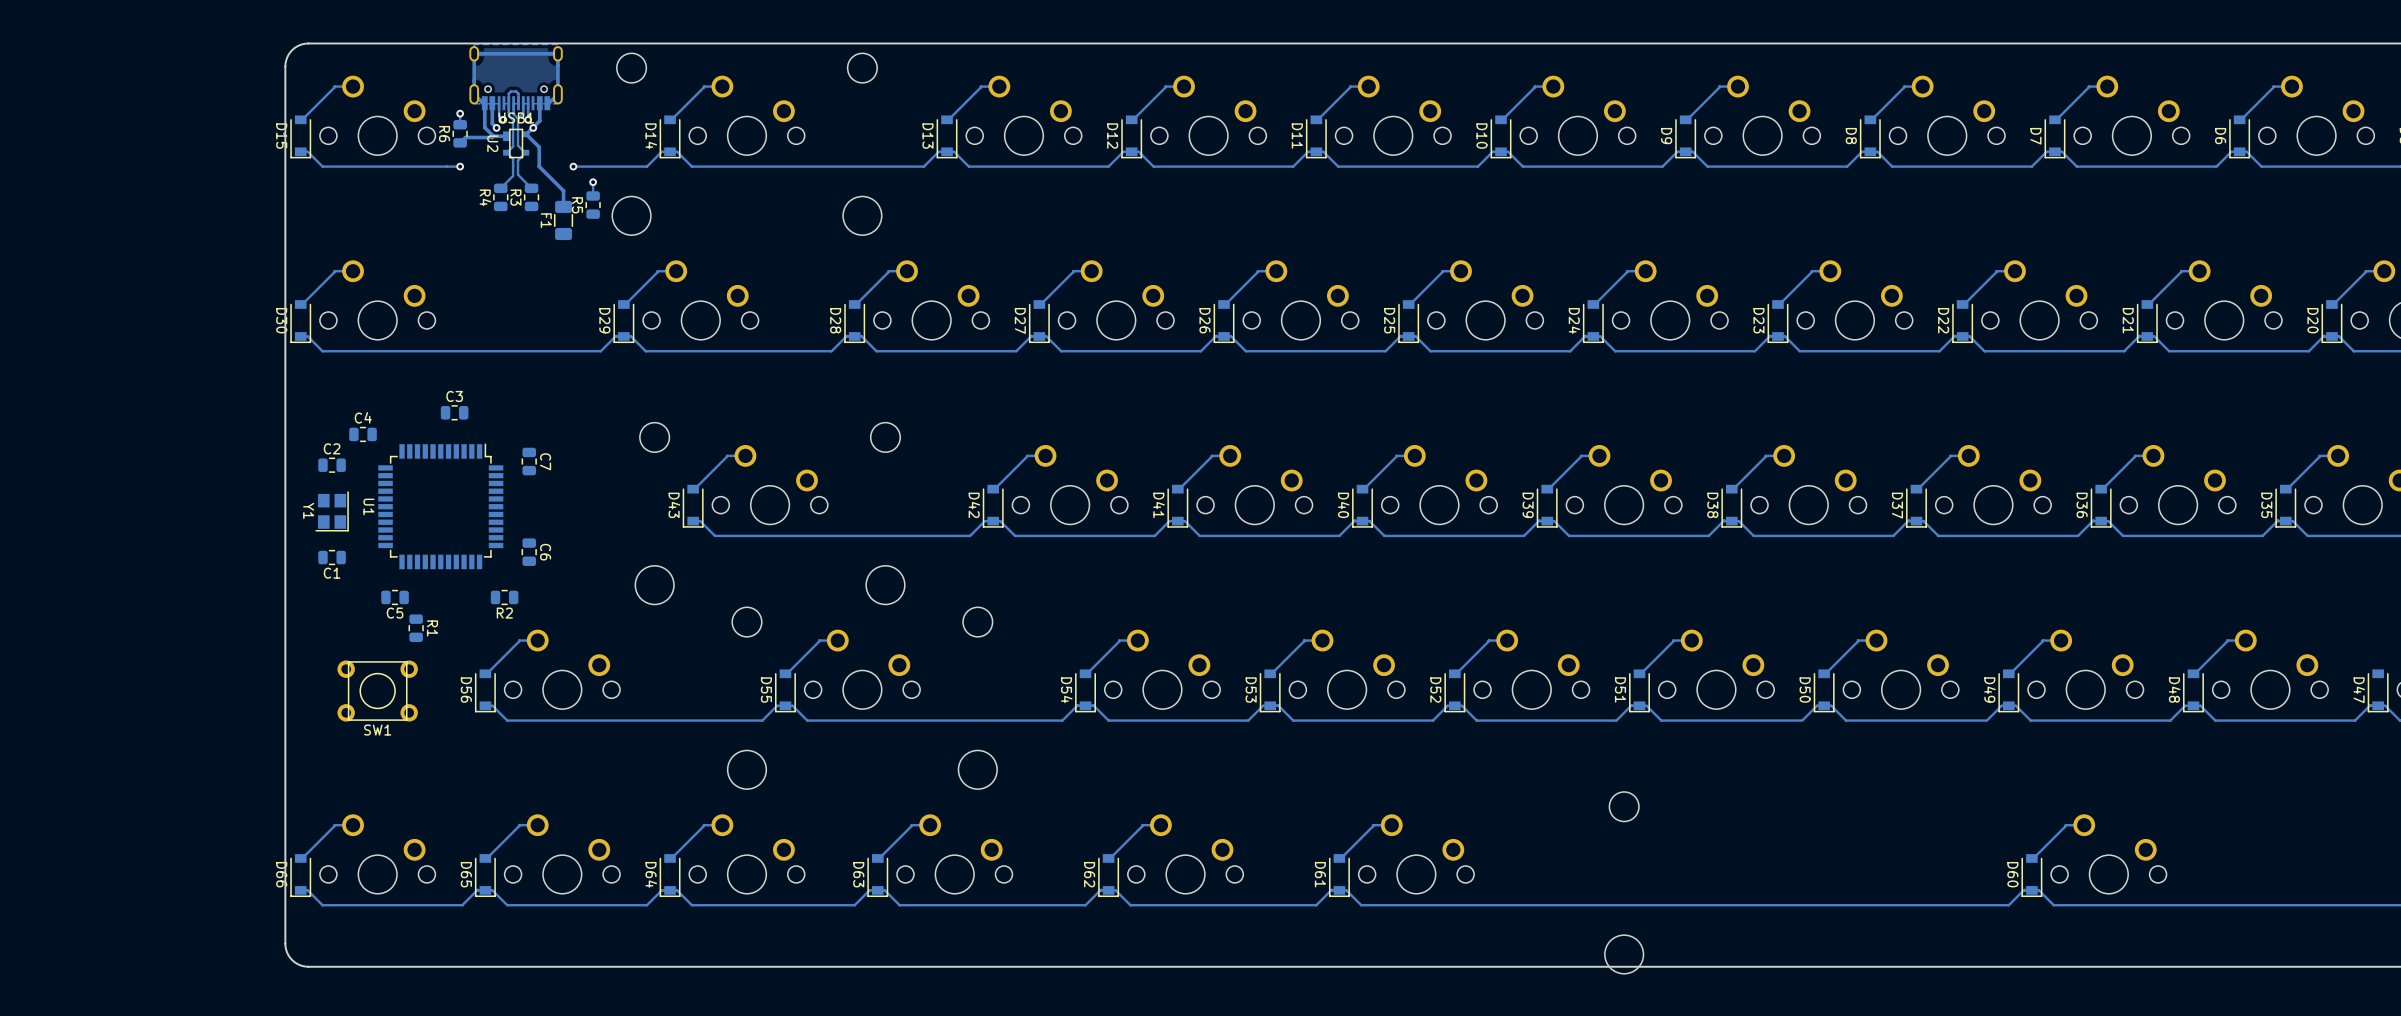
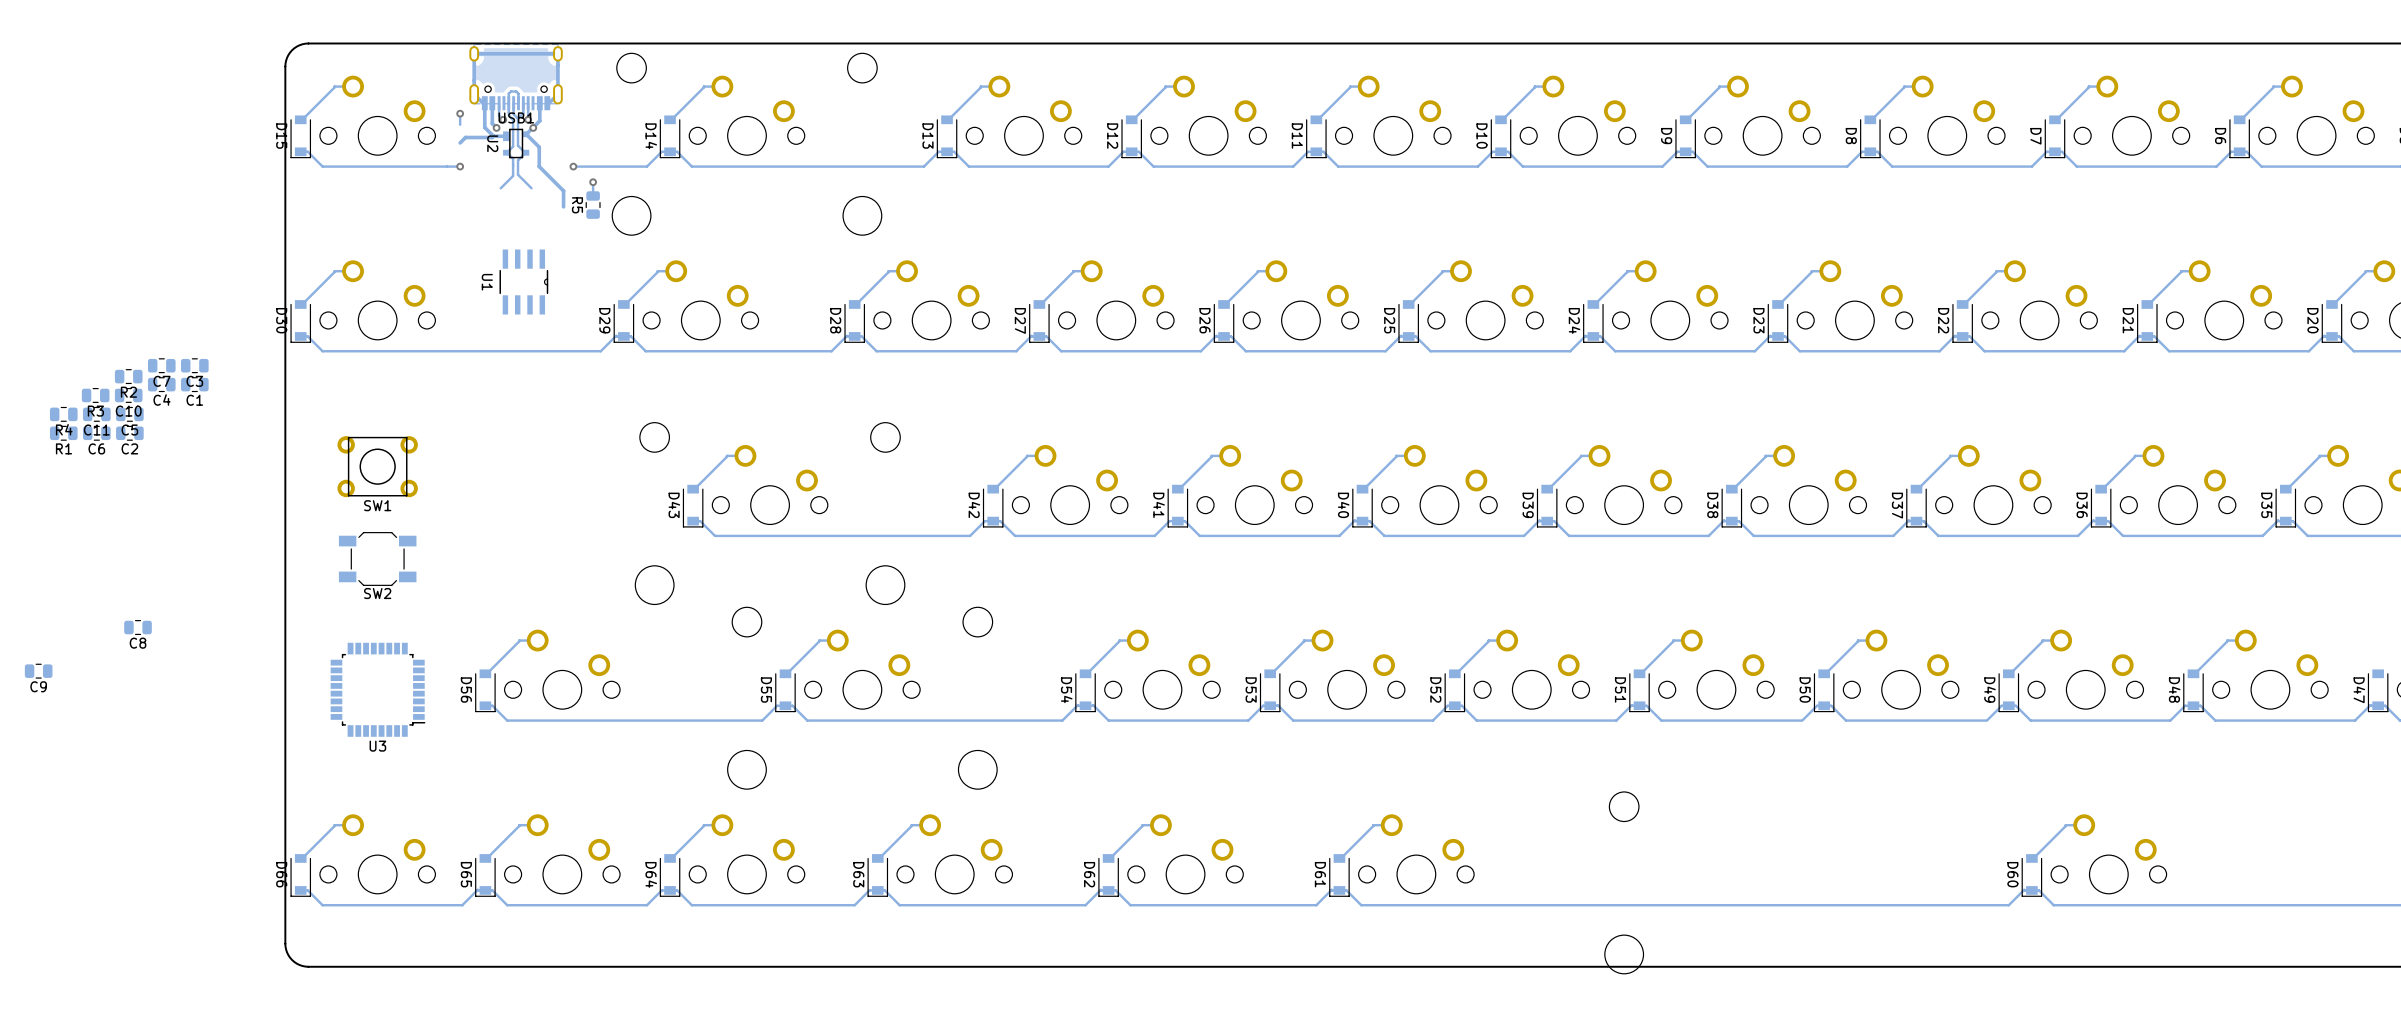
R6: (460, 133) -> none
R4 name position: R4 (485, 197) -> R4 (64, 429)
R4 rotation: 0° (500, 197) -> 90° clockwise (63, 414)
R4 position: (500, 197) -> (63, 414)
R3 name position: R3 (515, 197) -> R3 (95, 411)
R3 rotation: 0° (531, 197) -> 90° clockwise (95, 395)
R3 position: (531, 197) -> (95, 395)
F1: (563, 220) -> none
C10: none -> (128, 395)
C3 name position: C3 (454, 396) -> C3 (194, 381)
C3 position: (454, 412) -> (194, 365)
C11: none -> (96, 414)
C4 name position: C4 (363, 417) -> C4 (161, 400)
C4 position: (363, 434) -> (161, 384)
U1 footprint: [378, 443, 504, 570] -> [499, 249, 549, 315]
C2 name position: C2 (332, 448) -> C2 (129, 448)
C7 rotation: 0° (529, 461) -> 90° clockwise (161, 365)
C7 position: (529, 461) -> (161, 365)
C2 position: (332, 465) -> (129, 433)
U1 name position: U1 (368, 506) -> U1 (487, 282)
Y1: (332, 511) -> none
C6 rotation: 0° (529, 552) -> 90° clockwise (96, 433)
C6 position: (529, 552) -> (96, 433)
C1 position: (332, 557) -> (194, 384)
SW2: none -> (377, 558)
C5 position: (395, 597) -> (129, 414)
R2 position: (504, 597) -> (128, 376)
C8: none -> (138, 627)
R1 rotation: 0° (416, 628) -> 90° clockwise (63, 433)
R1 position: (416, 628) -> (63, 433)
C9: none -> (38, 671)
U3: none -> (378, 689)
SW1 position: (377, 691) -> (377, 466)

